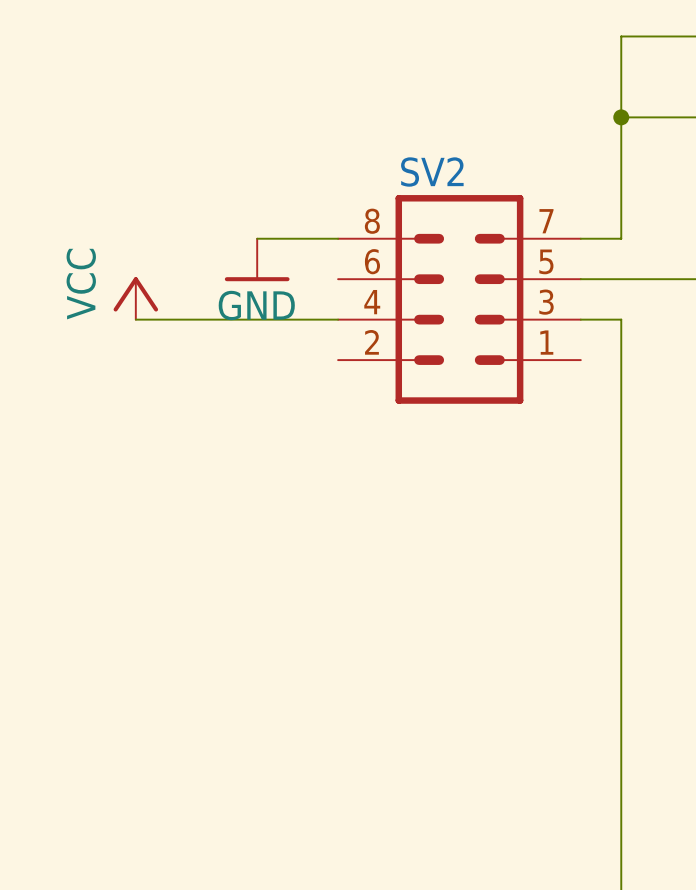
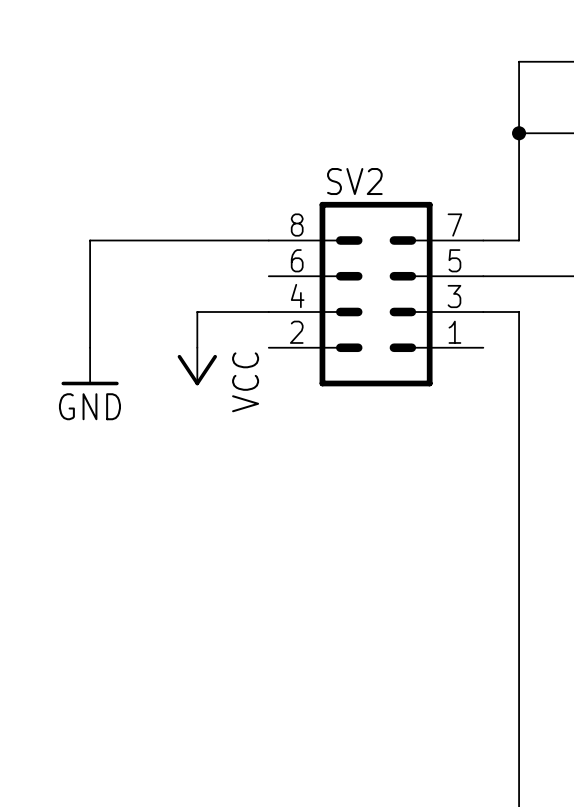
wire: none -> (197, 240) (90, 240) (90, 347)
power symbol position: GND (257, 259) -> GND (90, 366)
power symbol rotation: 0° (135, 294) -> 180° (197, 370)
power symbol position: VCC (135, 298) -> VCC (197, 366)
wire: (135, 319) (257, 319) -> (197, 347) (197, 312)

